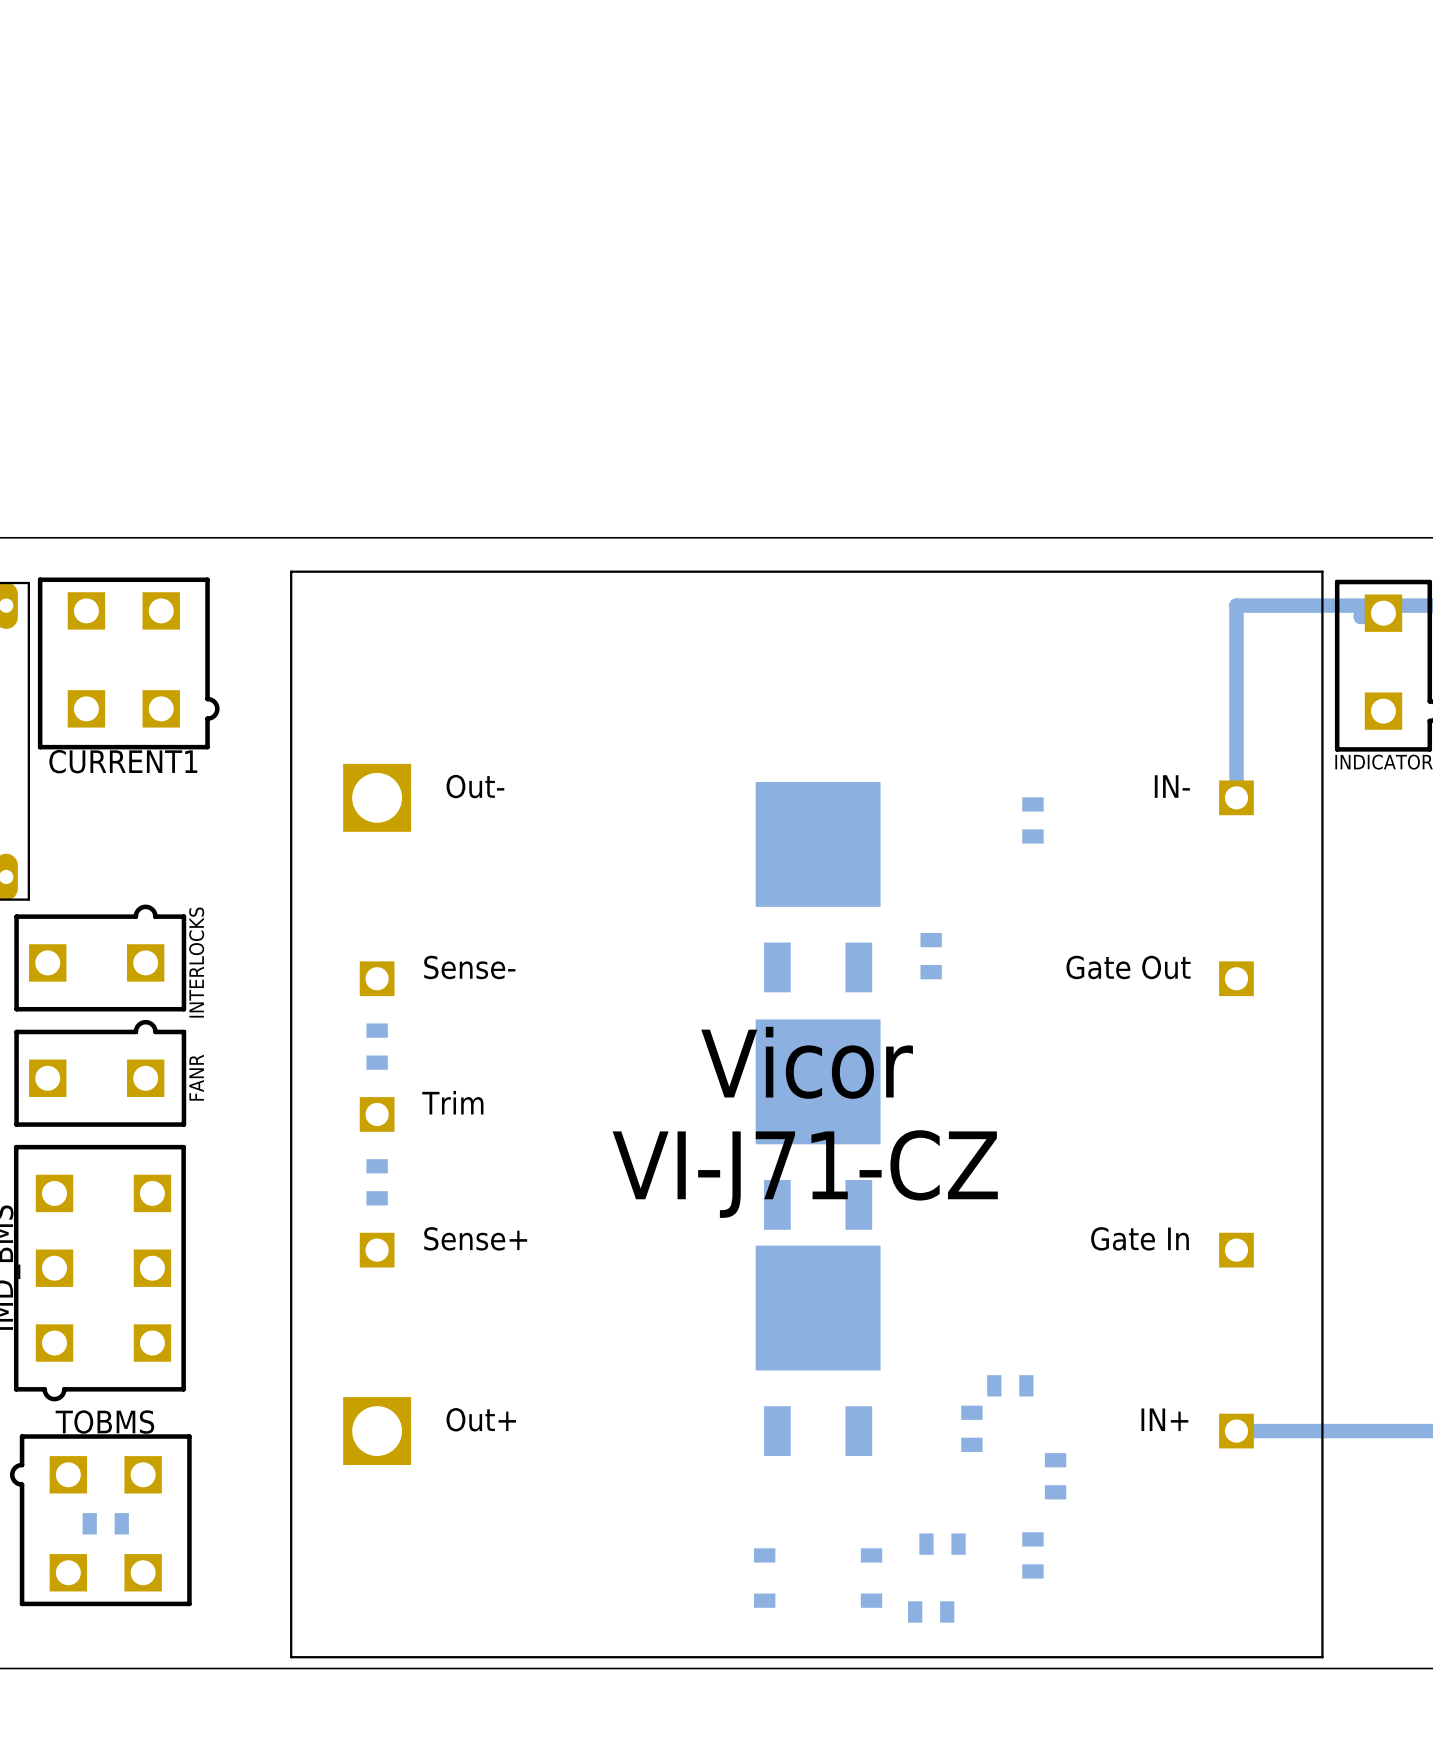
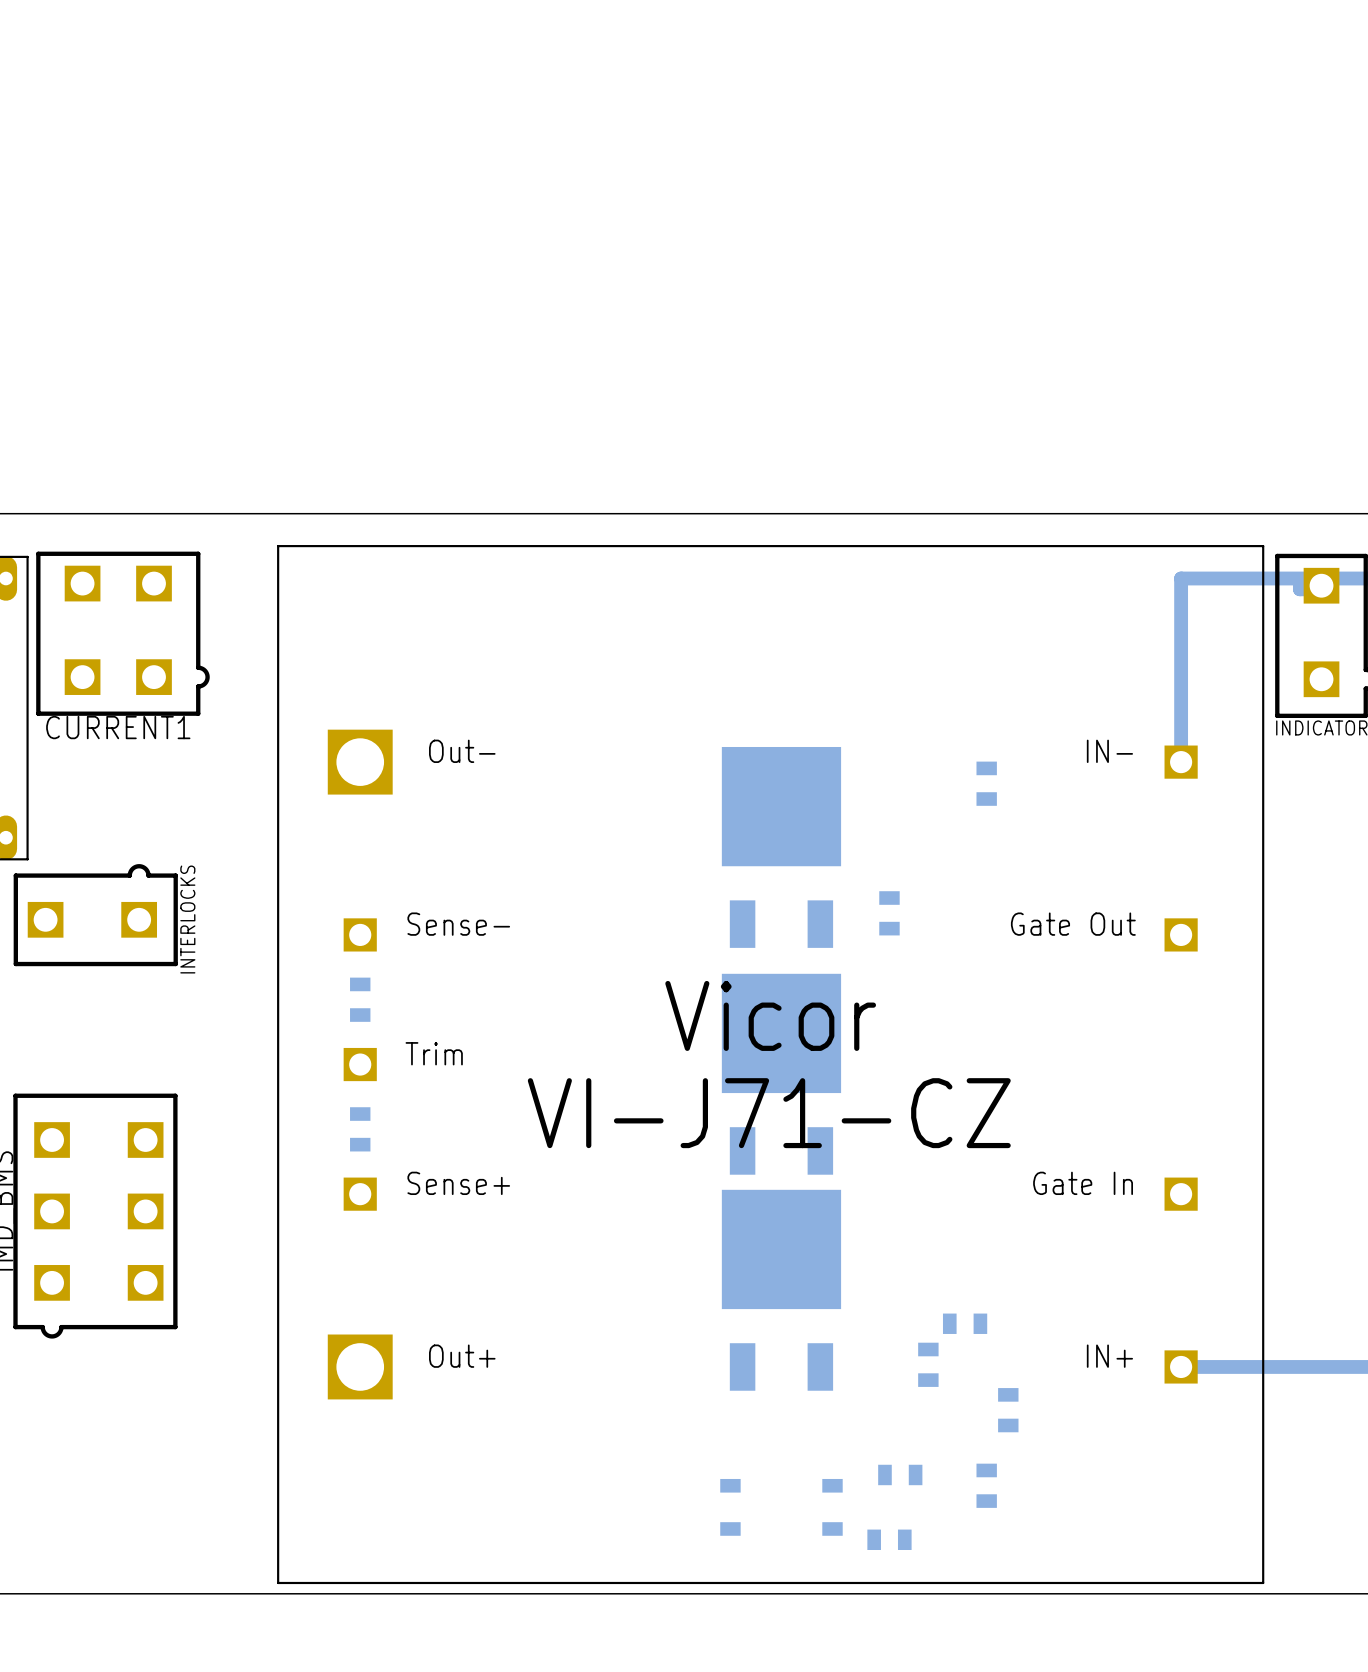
FANR: (100, 1073) -> none
TOBMS: (100, 1520) -> none
part: (105, 1523) -> none

